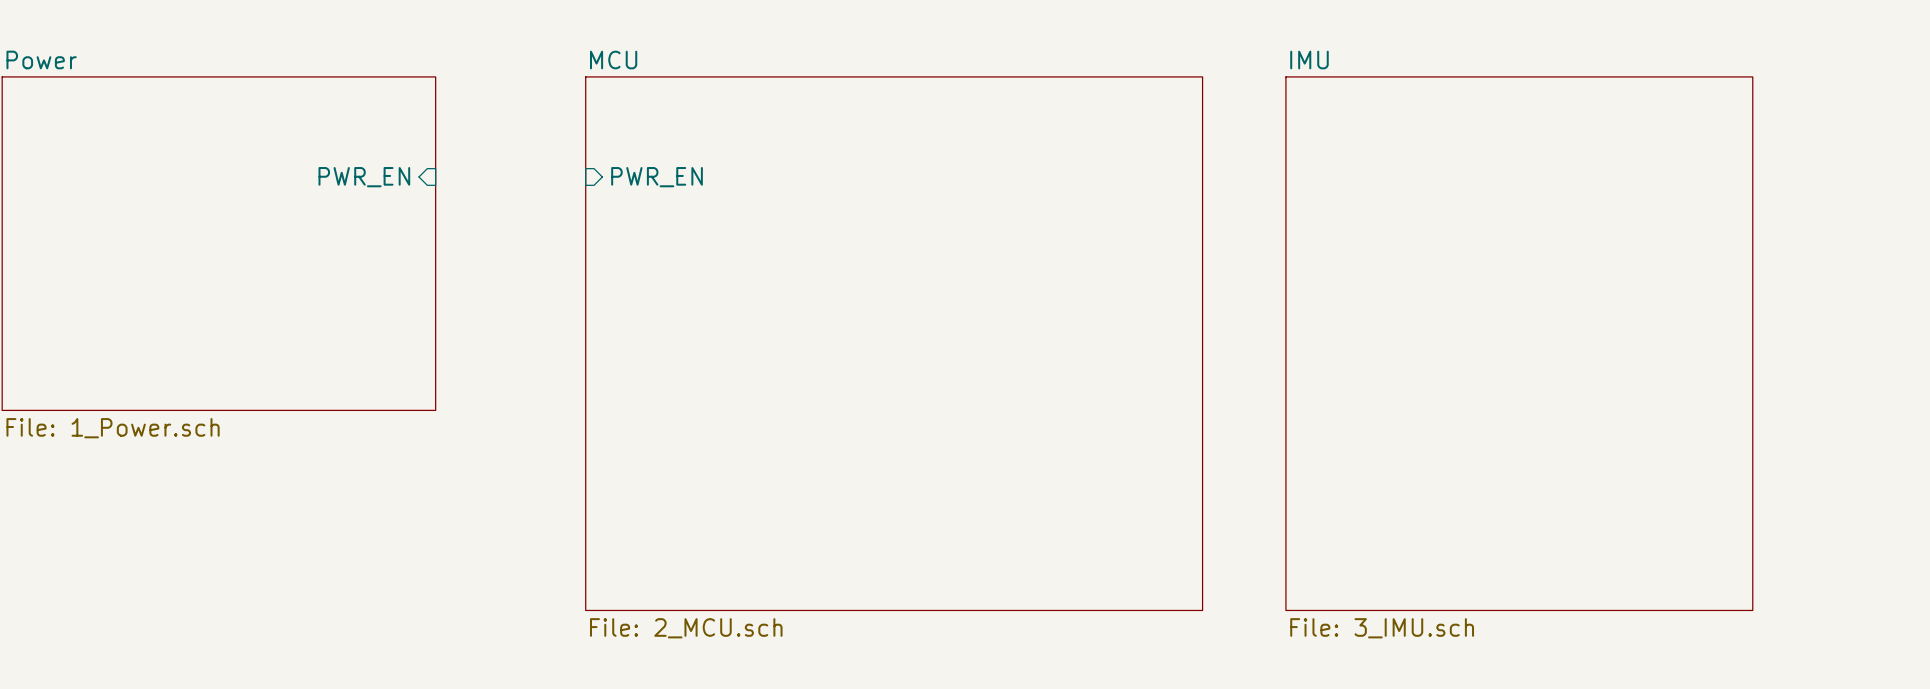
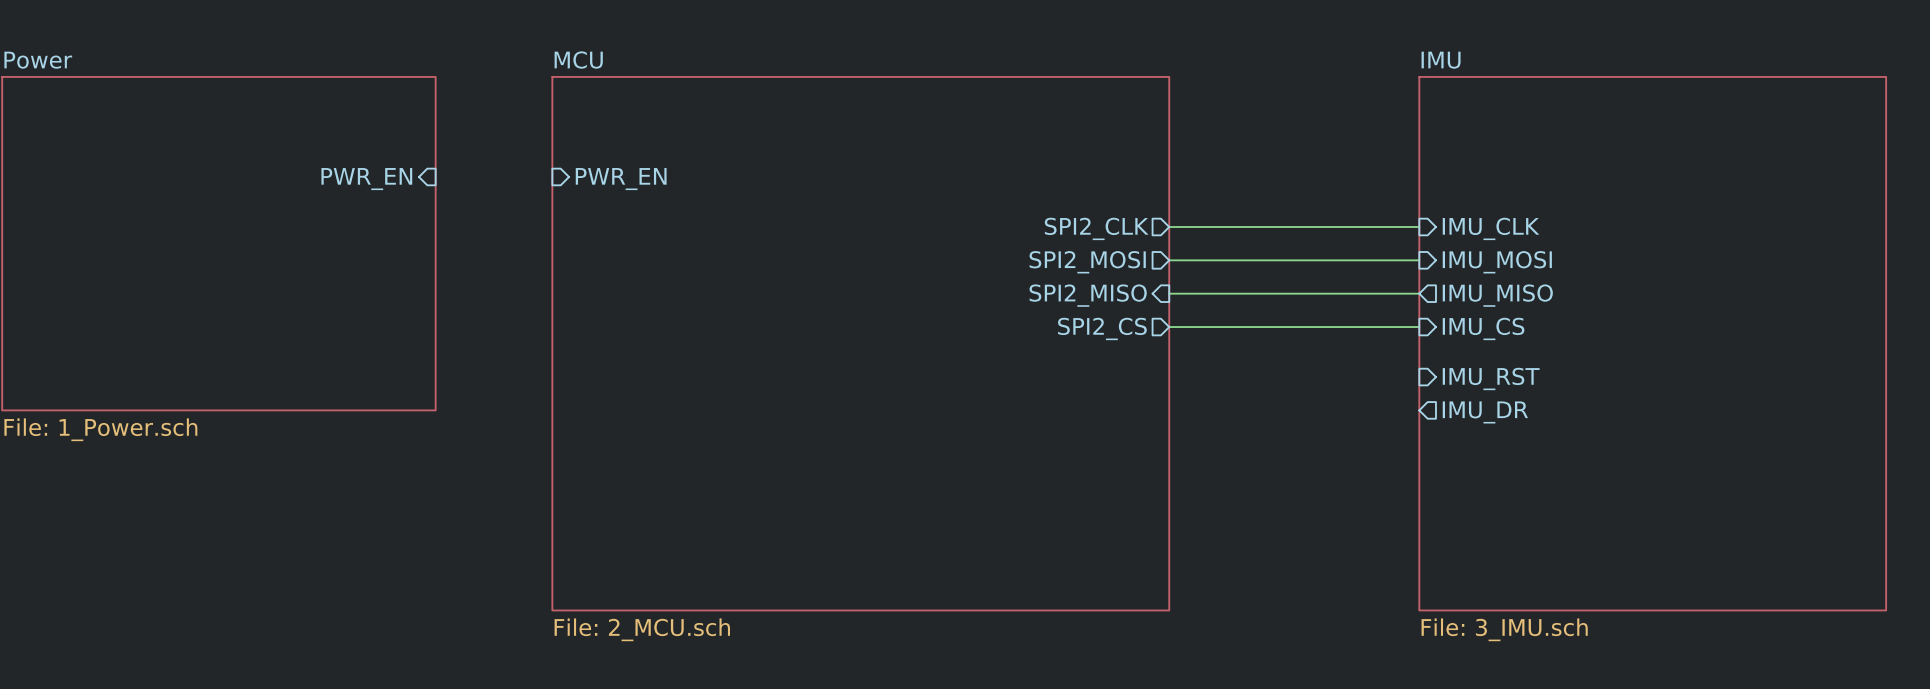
sheet pin position: PWR_EN (657, 177) -> PWR_EN (621, 179)
wire: none -> (1169, 226) (1419, 226)
sheet pin: none -> SPI2_CLK (1096, 228)
sheet pin: none -> IMU_CLK (1491, 228)
sheet pin: none -> SPI2_MOSI (1087, 262)
wire: none -> (1169, 260) (1419, 260)
sheet pin: none -> IMU_MOSI (1497, 262)
sheet pin: none -> SPI2_MISO (1088, 295)
wire: none -> (1169, 293) (1419, 293)
sheet pin: none -> IMU_MISO (1497, 295)
sheet pin: none -> SPI2_CS (1102, 328)
wire: none -> (1169, 327) (1419, 327)
sheet pin: none -> IMU_CS (1483, 328)
sheet MCU position: (894, 343) -> (860, 343)
sheet IMU position: (1519, 343) -> (1652, 343)
sheet pin: none -> IMU_RST (1491, 378)
sheet pin: none -> IMU_DR (1485, 412)

